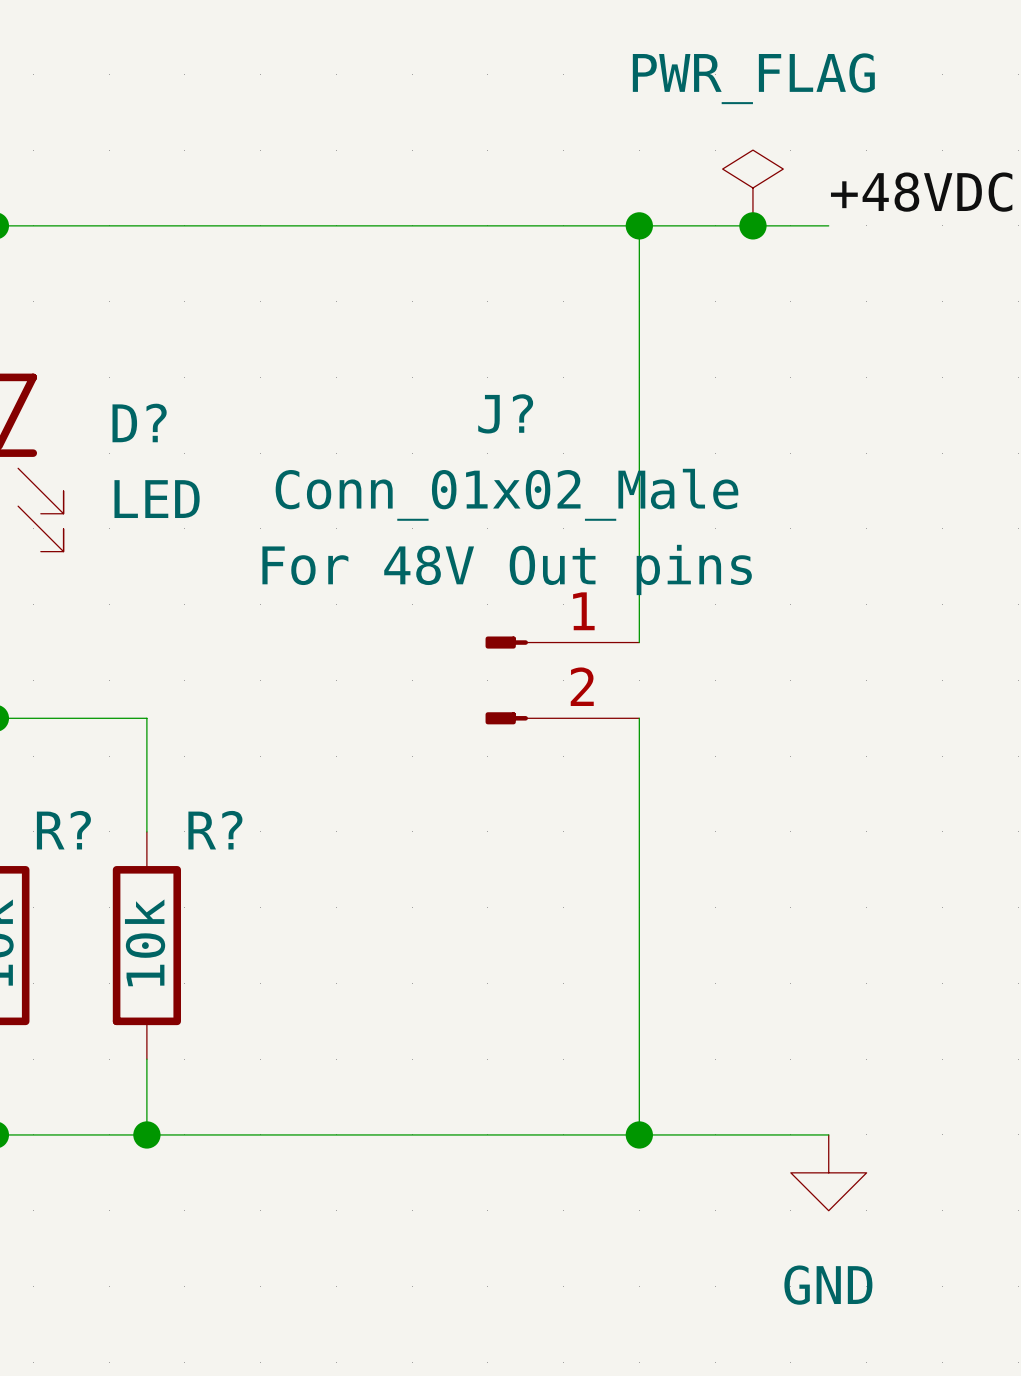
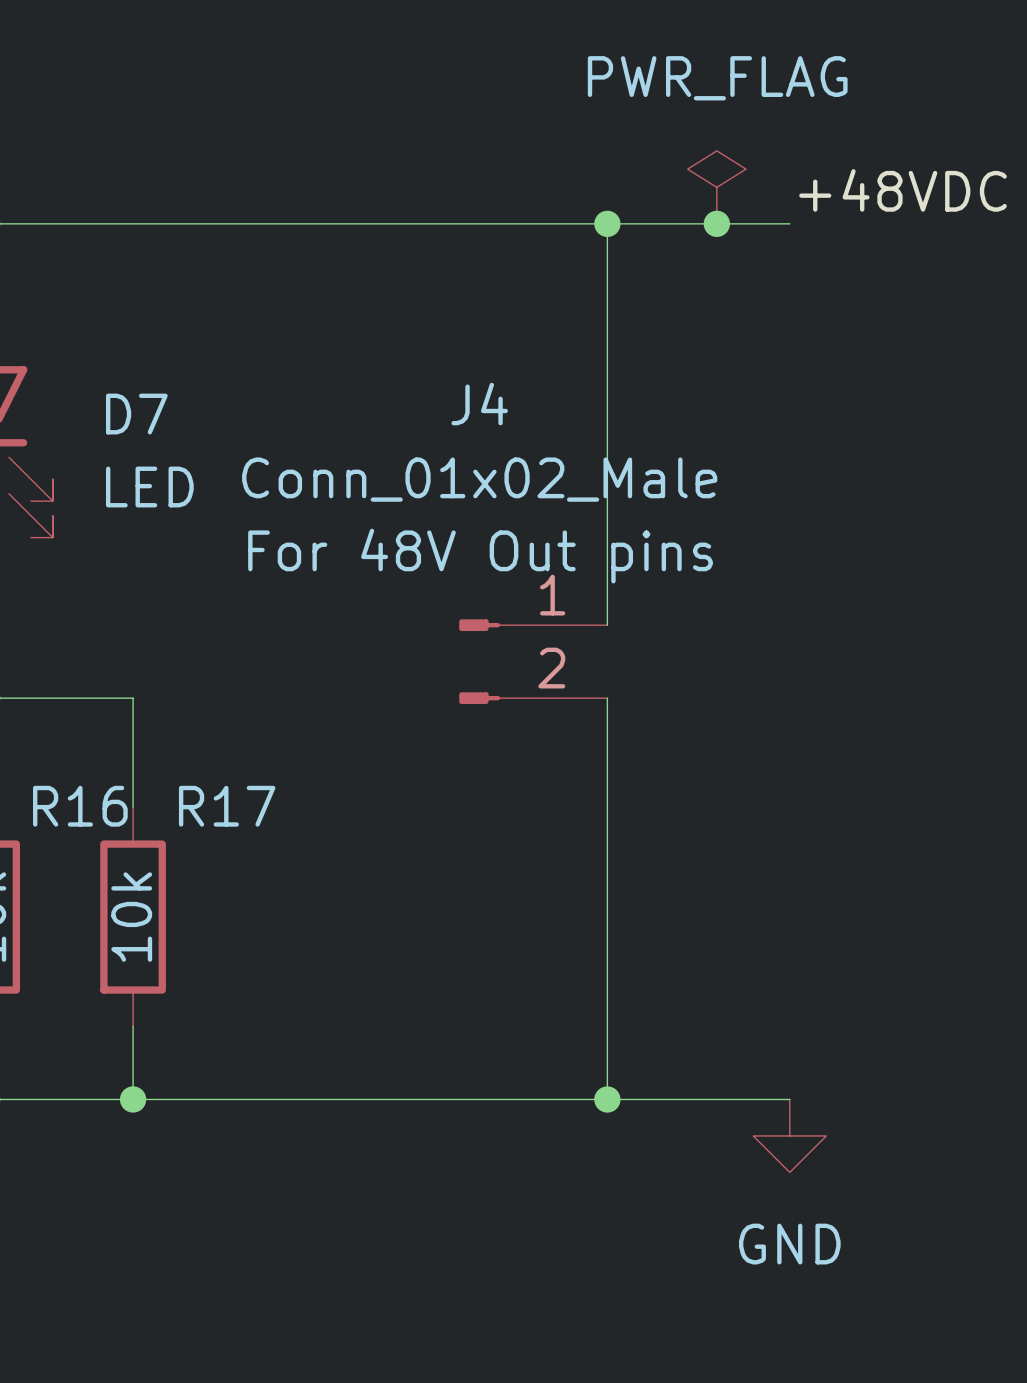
J? name: J? (505, 413) -> J4 (479, 404)
D? name: D? (139, 422) -> D7 (136, 414)
R? name: R? (63, 830) -> R16 (80, 806)
R? name: R? (215, 830) -> R17 (227, 806)

